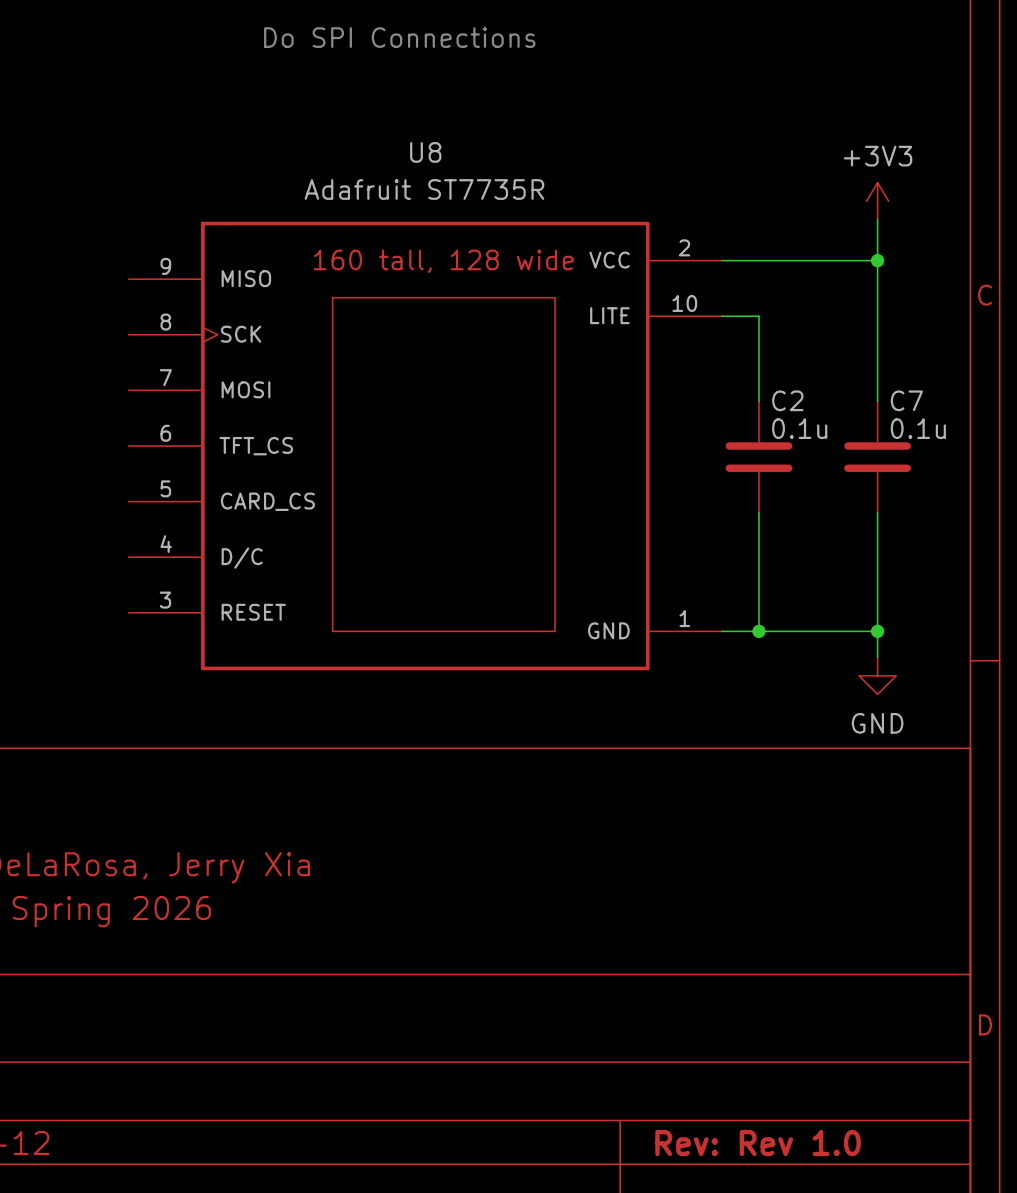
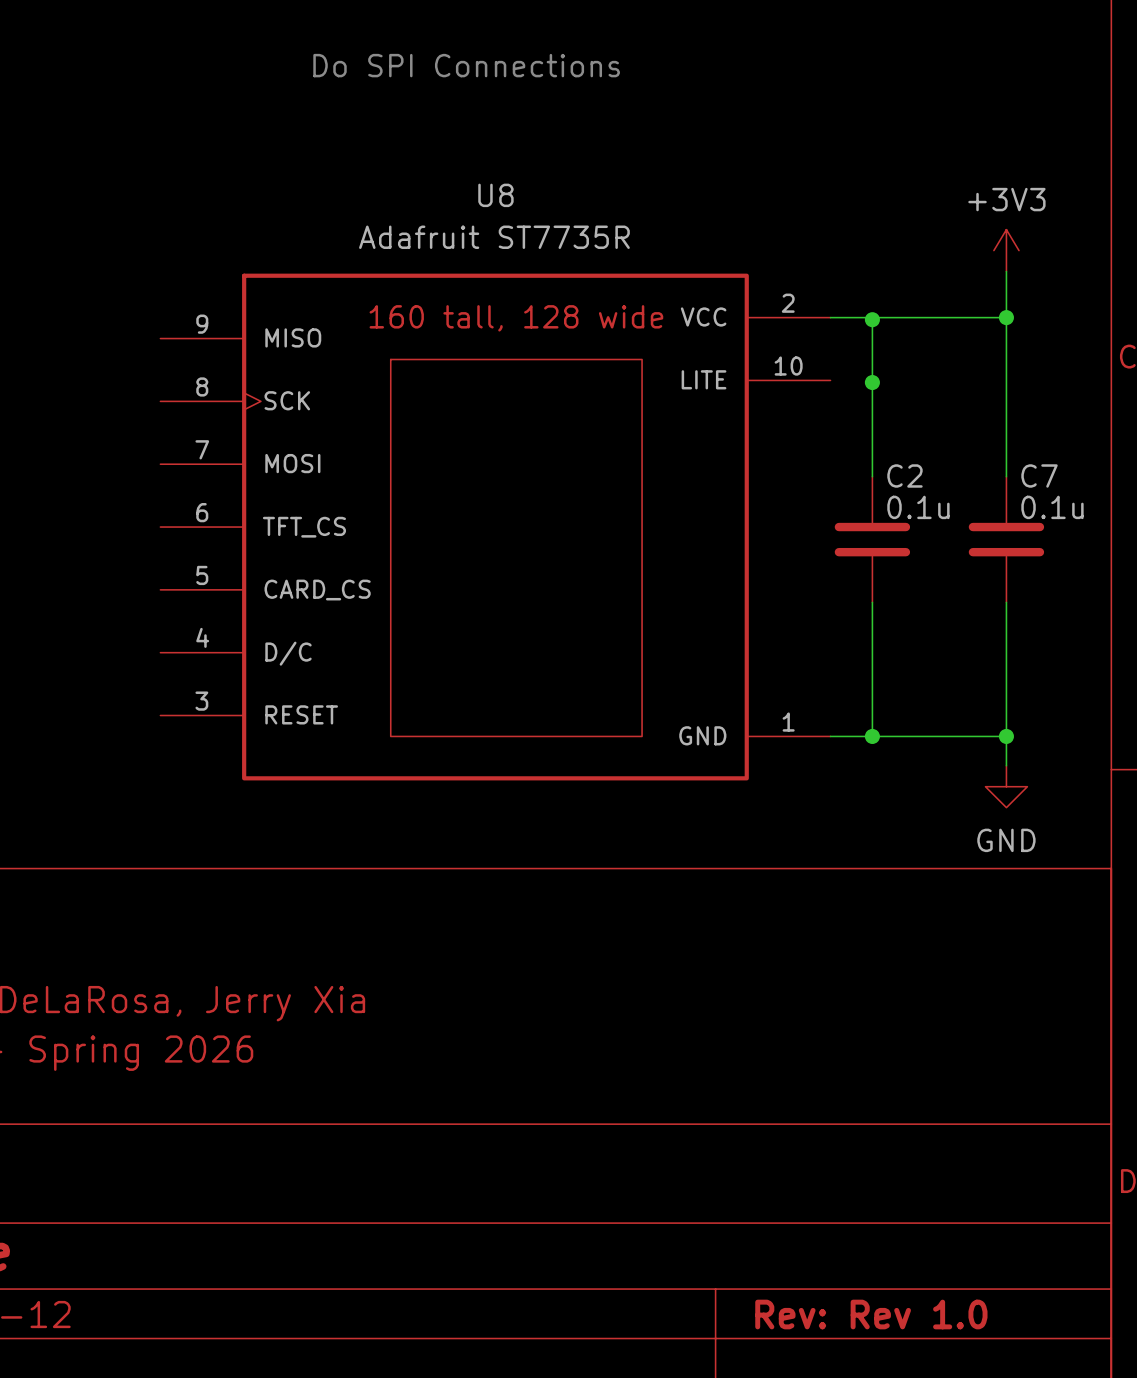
junction: none -> (872, 319)
wire: (721, 316) (758, 316) -> (872, 319) (872, 380)
junction: none -> (872, 382)

